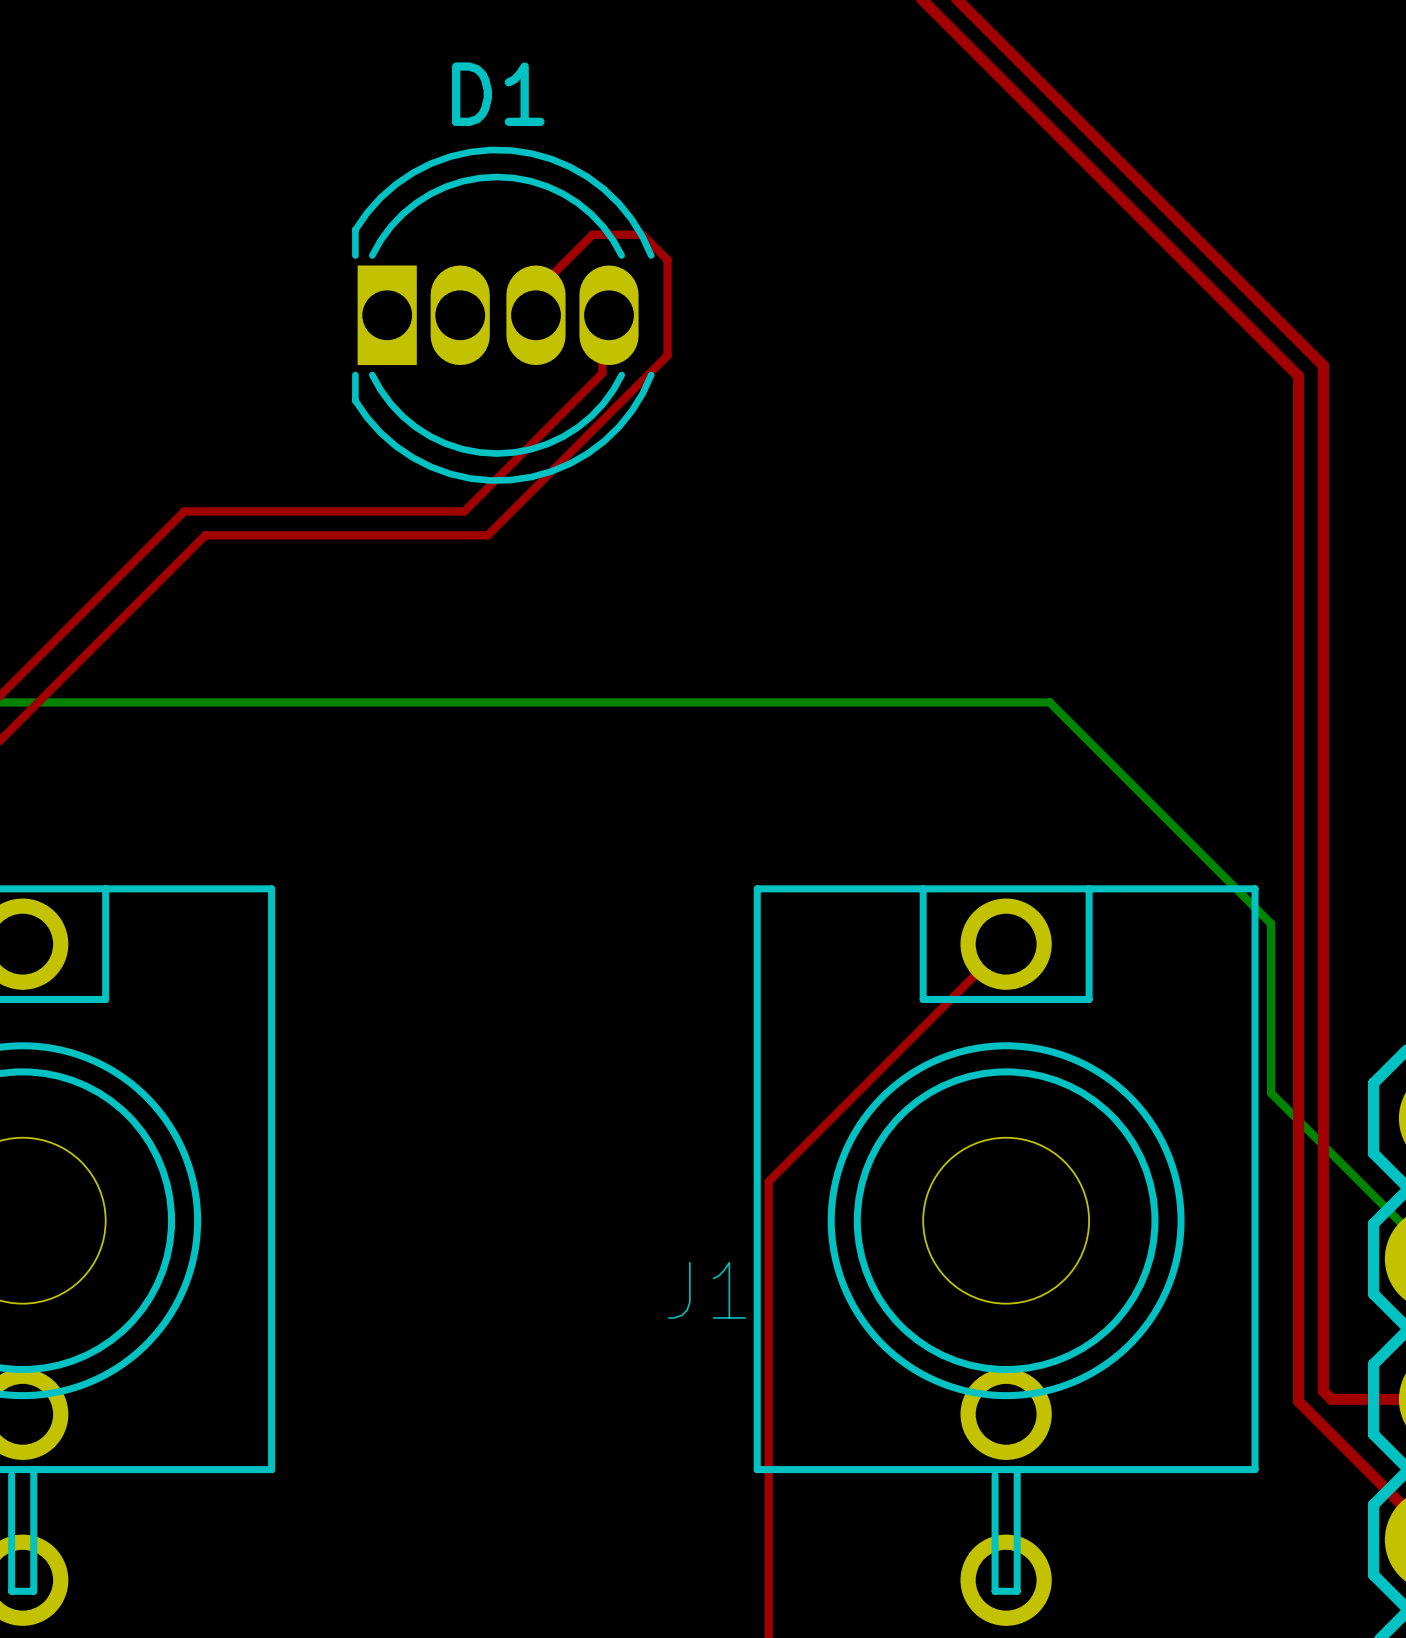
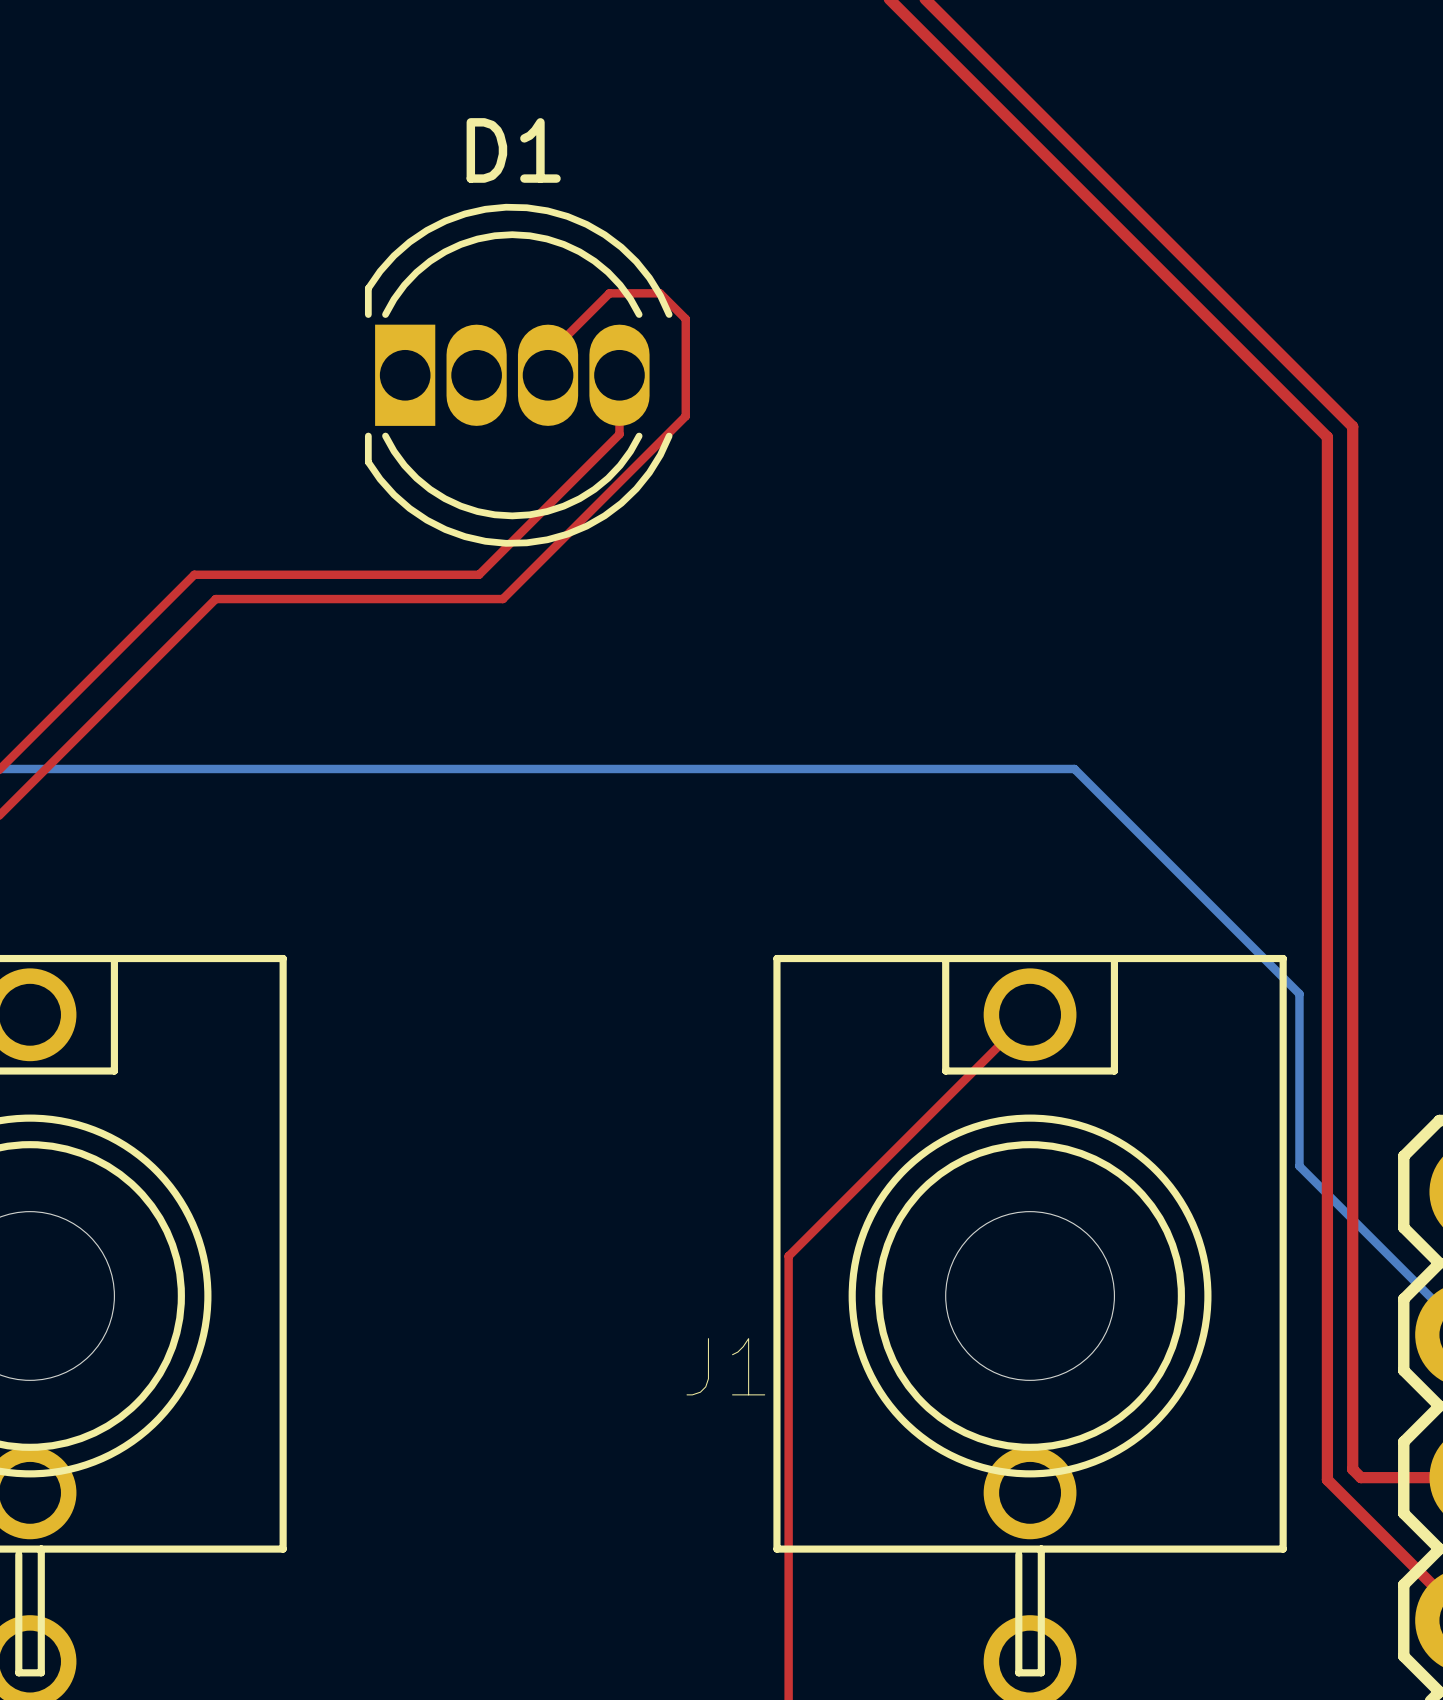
D1 footprint: [352, 146, 655, 484] -> [364, 203, 673, 547]

